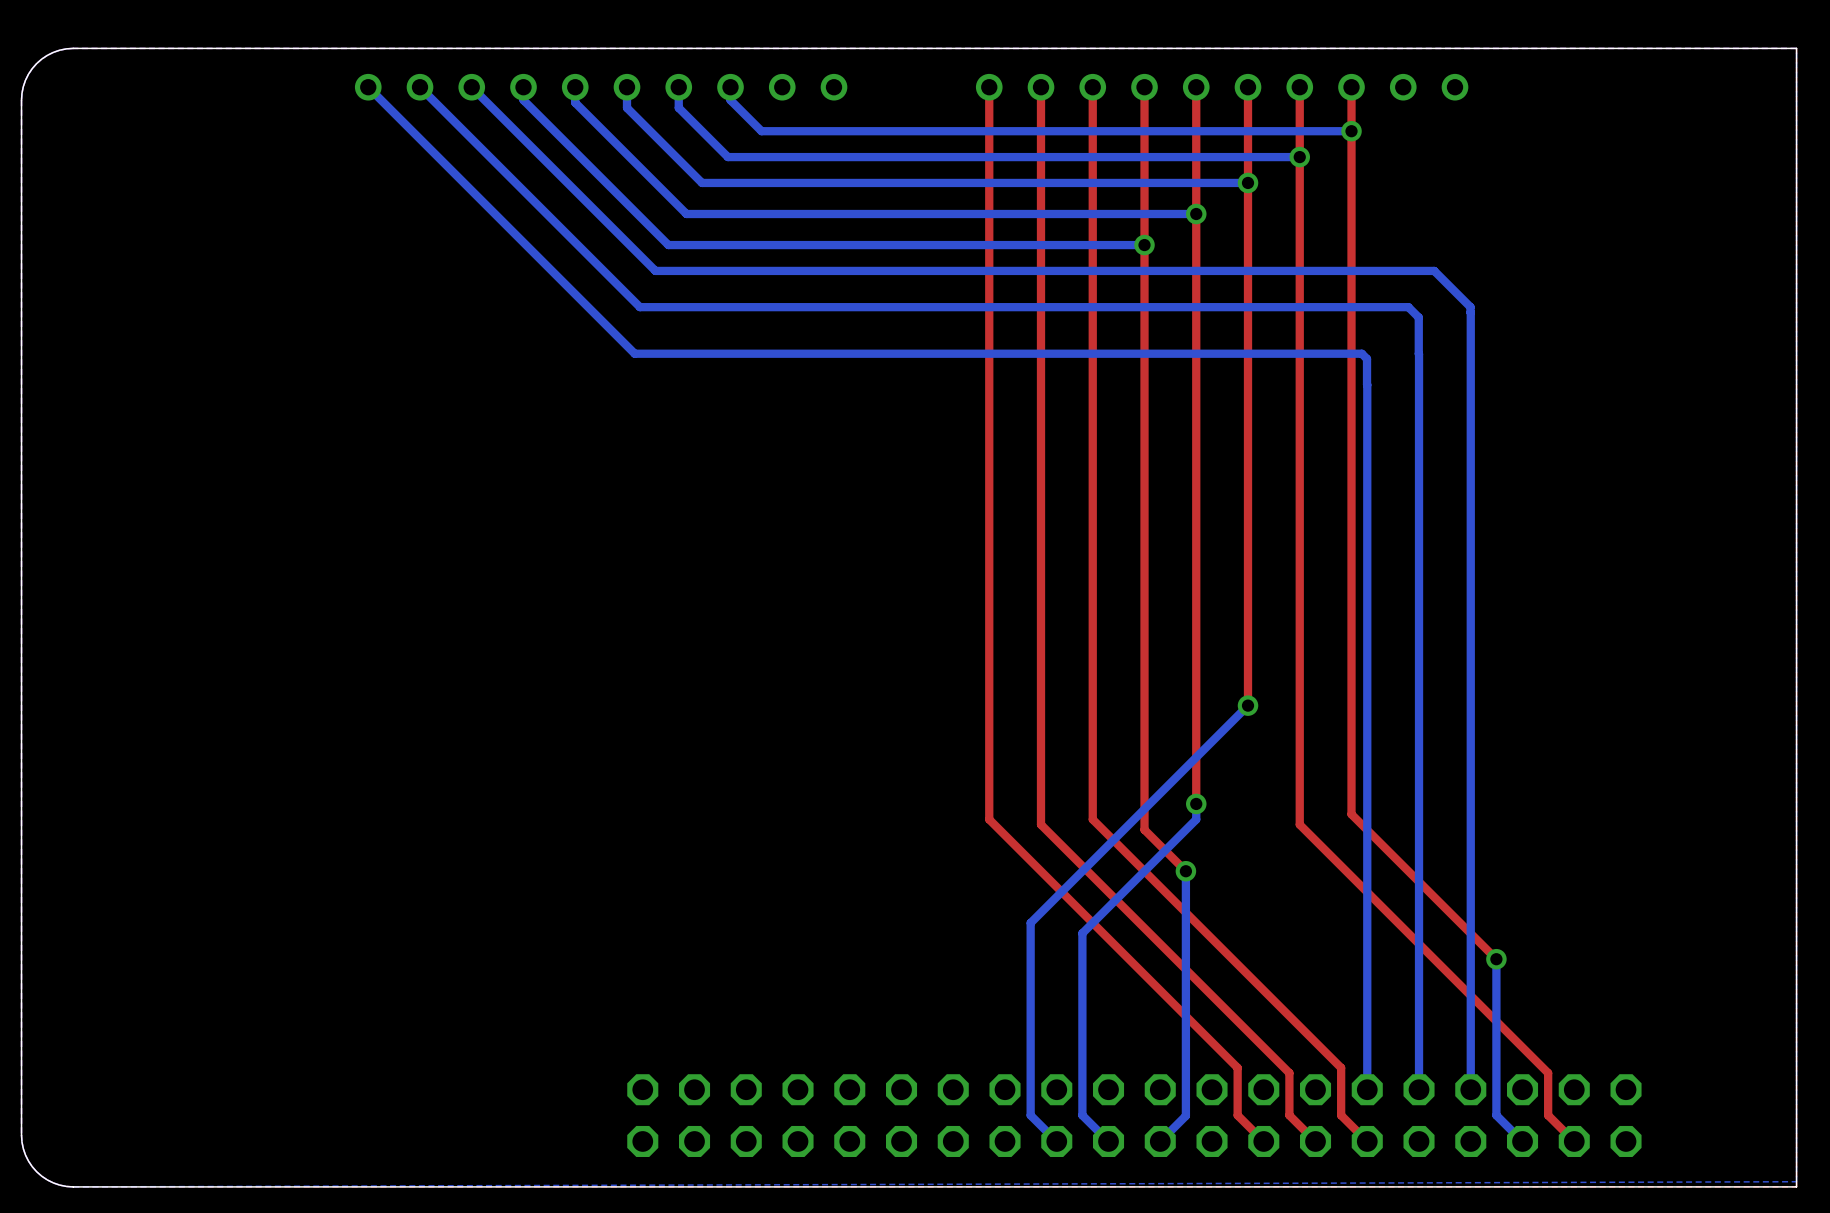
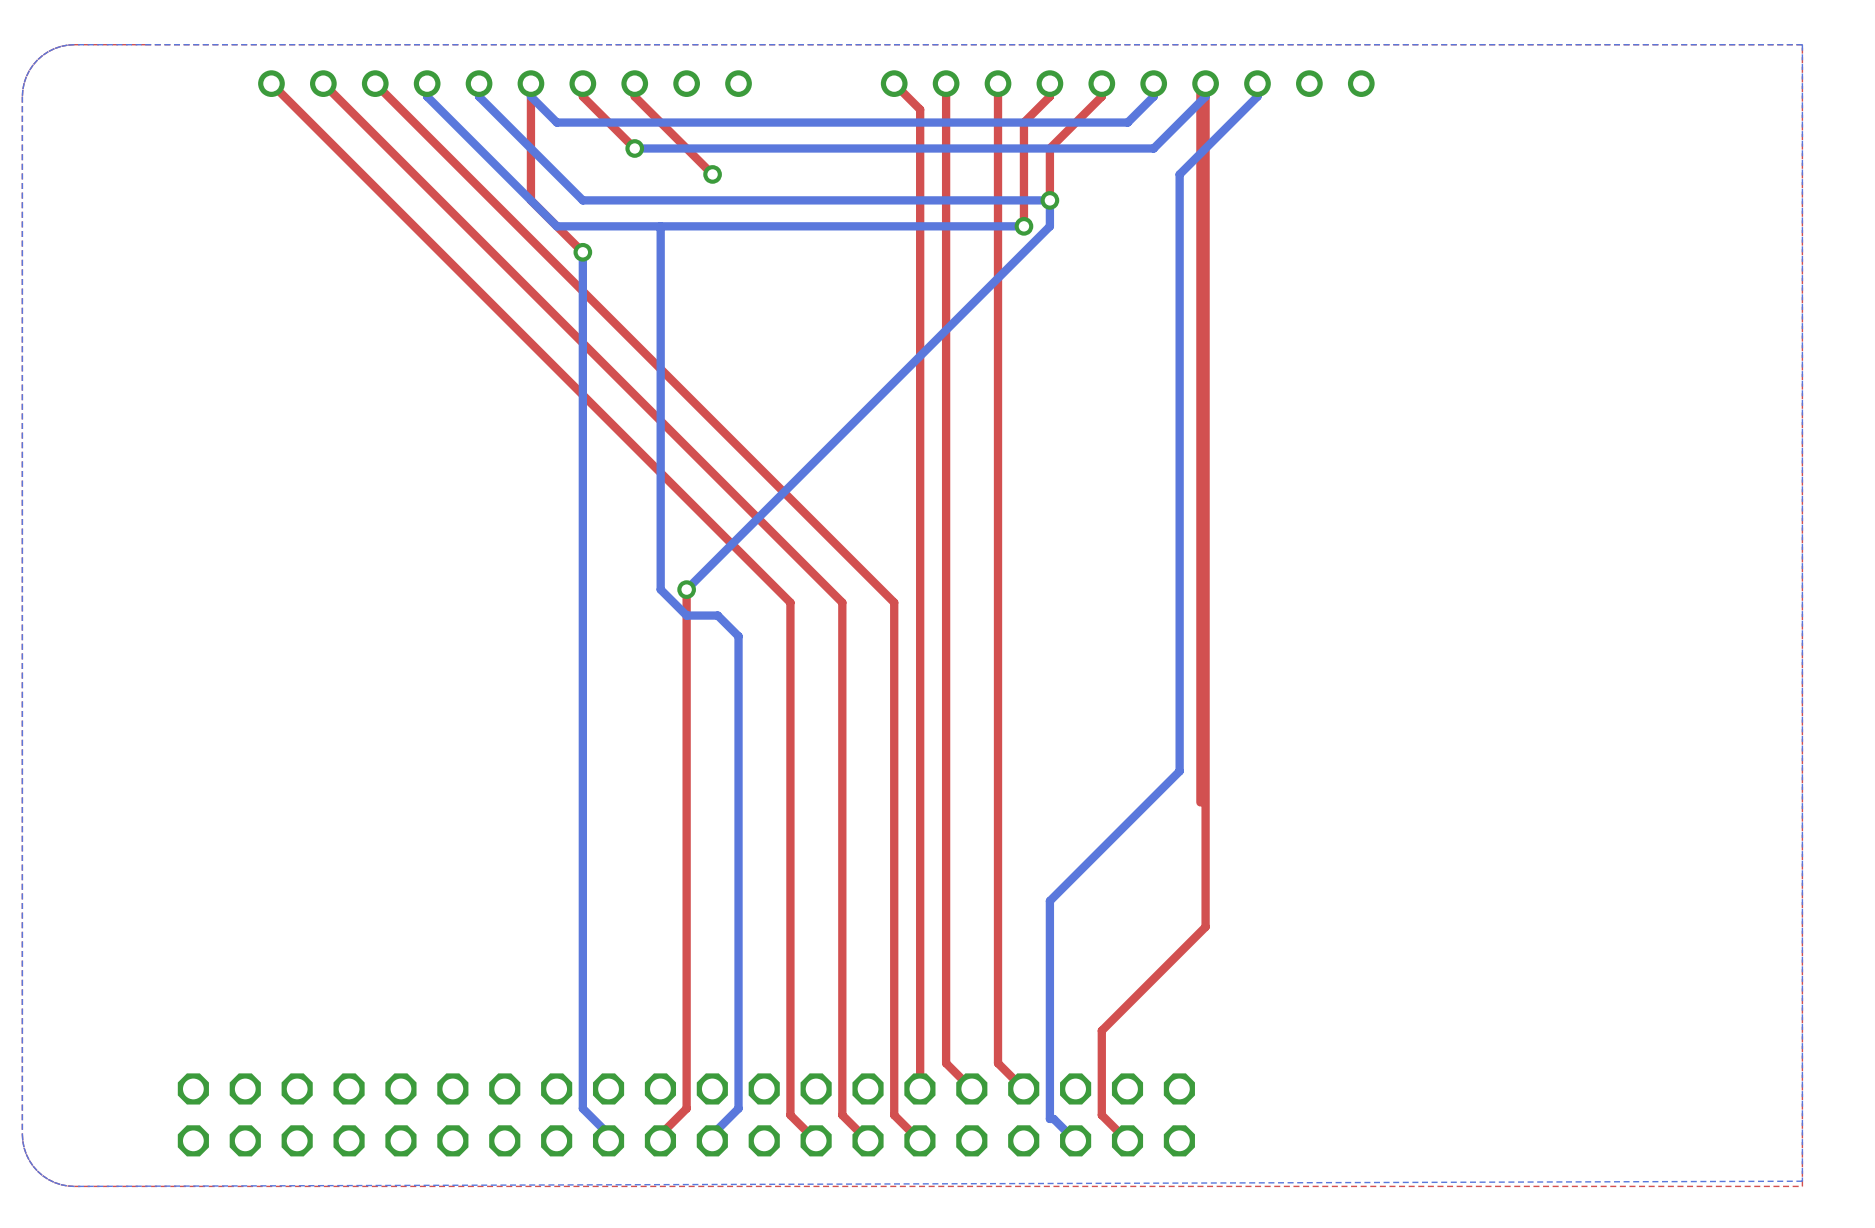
board edge: (1796, 48) (73, 48) (59, 50) (47, 55) (36, 63) (28, 74) (23, 86) (21, 100) (21, 1135) (23, 1148) (28, 1161) (36, 1171) (47, 1179) (59, 1185) (73, 1186) (1796, 1186) (1796, 48) -> none
top track: none -> (271, 83) (790, 602) (790, 1115) (816, 1140)
top track: none -> (323, 83) (842, 602) (842, 1115) (868, 1140)
bottom track: (368, 87) (634, 353) (1361, 353) (1367, 358) (1367, 384) -> none
top track: none -> (375, 83) (894, 602) (894, 1115) (919, 1140)
bottom track: (420, 87) (639, 307) (1408, 307) (1418, 317) (1418, 353) -> none
bottom track: none -> (427, 83) (427, 96) (556, 226) (1023, 226)
bottom track: (471, 87) (655, 270) (1434, 270) (1470, 307) (1470, 312) -> none
bottom track: none -> (479, 83) (479, 96) (582, 200) (1049, 200) (1049, 226) (686, 589)
bottom track: (523, 87) (523, 100) (668, 245) (1144, 245) -> none
top track: none -> (530, 83) (530, 200) (582, 252)
bottom track: (575, 87) (575, 102) (686, 214) (1196, 214) -> none
top track: none -> (582, 83) (582, 96) (634, 148)
part position: (601, 87) -> (504, 83)
bottom track: (627, 87) (627, 107) (702, 182) (1248, 182) -> none
top track: none -> (634, 83) (634, 96) (712, 174)
bottom track: (678, 87) (678, 107) (727, 157) (1299, 157) -> none
bottom track: (730, 87) (730, 100) (761, 131) (1351, 131) -> none
top track: none -> (894, 83) (920, 109) (920, 1088)
top track: none -> (946, 83) (946, 1063) (971, 1088)
top track: (989, 87) (989, 819) (1237, 1067) (1237, 1115) (1263, 1141) -> none
top track: none -> (998, 83) (998, 1063) (1023, 1088)
top track: (1041, 87) (1041, 824) (1289, 1073) (1289, 1115) (1315, 1141) -> none
top track: none -> (1049, 83) (1049, 96) (1023, 122) (1023, 226)
top track: (1092, 87) (1092, 819) (1341, 1067) (1341, 1115) (1367, 1141) -> none
top track: none -> (1101, 83) (1101, 96) (1049, 148) (1049, 200)
top track: (1144, 87) (1144, 829) (1185, 871) -> none
bottom track: none -> (1153, 83) (1153, 96) (1127, 122) (556, 122) (530, 96) (530, 83)
top track: none -> (1205, 83) (1205, 926) (1101, 1030) (1101, 1115) (1127, 1140)
bottom track: none -> (1205, 83) (1205, 96) (1153, 148) (634, 148)
part position: (1222, 87) -> (1127, 83)
top track: (1248, 87) (1248, 705) -> none
bottom track: none -> (1257, 83) (1257, 96) (1179, 174) (1179, 771) (1049, 900) (1049, 1118) (1053, 1118) (1075, 1140)
top track: (1299, 87) (1299, 824) (1548, 1073) (1548, 1115) (1574, 1141) -> none
top track: (1351, 87) (1351, 814) (1496, 959) -> none
via: (1351, 131) -> none
via: none -> (634, 148)
via: (1299, 157) -> none
via: none -> (712, 174)
via: (1248, 182) -> none
via: none -> (1049, 200)
via: (1196, 214) -> none
bottom track: none -> (660, 226) (660, 589) (686, 615) (717, 615) (738, 636) (738, 1108) (712, 1134) (712, 1140)
via: none -> (1023, 226)
via: (1144, 245) -> none
bottom track: none -> (582, 252) (582, 1108) (608, 1134) (608, 1140)
via: none -> (582, 252)
bottom track: (1470, 312) (1470, 1089) -> none
bottom track: (1419, 353) (1419, 1089) -> none
bottom track: (1367, 385) (1367, 1089) -> none
top track: none -> (686, 589) (686, 1108) (660, 1134) (660, 1140)
via: none -> (686, 589)
bottom track: (1248, 705) (1030, 922) (1030, 1115) (1056, 1141) -> none
via: (1248, 705) -> none
bottom track: (1196, 803) (1196, 819) (1082, 933) (1082, 1115) (1108, 1141) -> none
via: (1196, 803) -> none
bottom track: (1185, 871) (1185, 1115) (1160, 1141) -> none
via: (1185, 871) -> none
bottom track: (1496, 959) (1496, 1115) (1522, 1141) -> none
via: (1496, 959) -> none
part position: (1134, 1115) -> (686, 1114)

